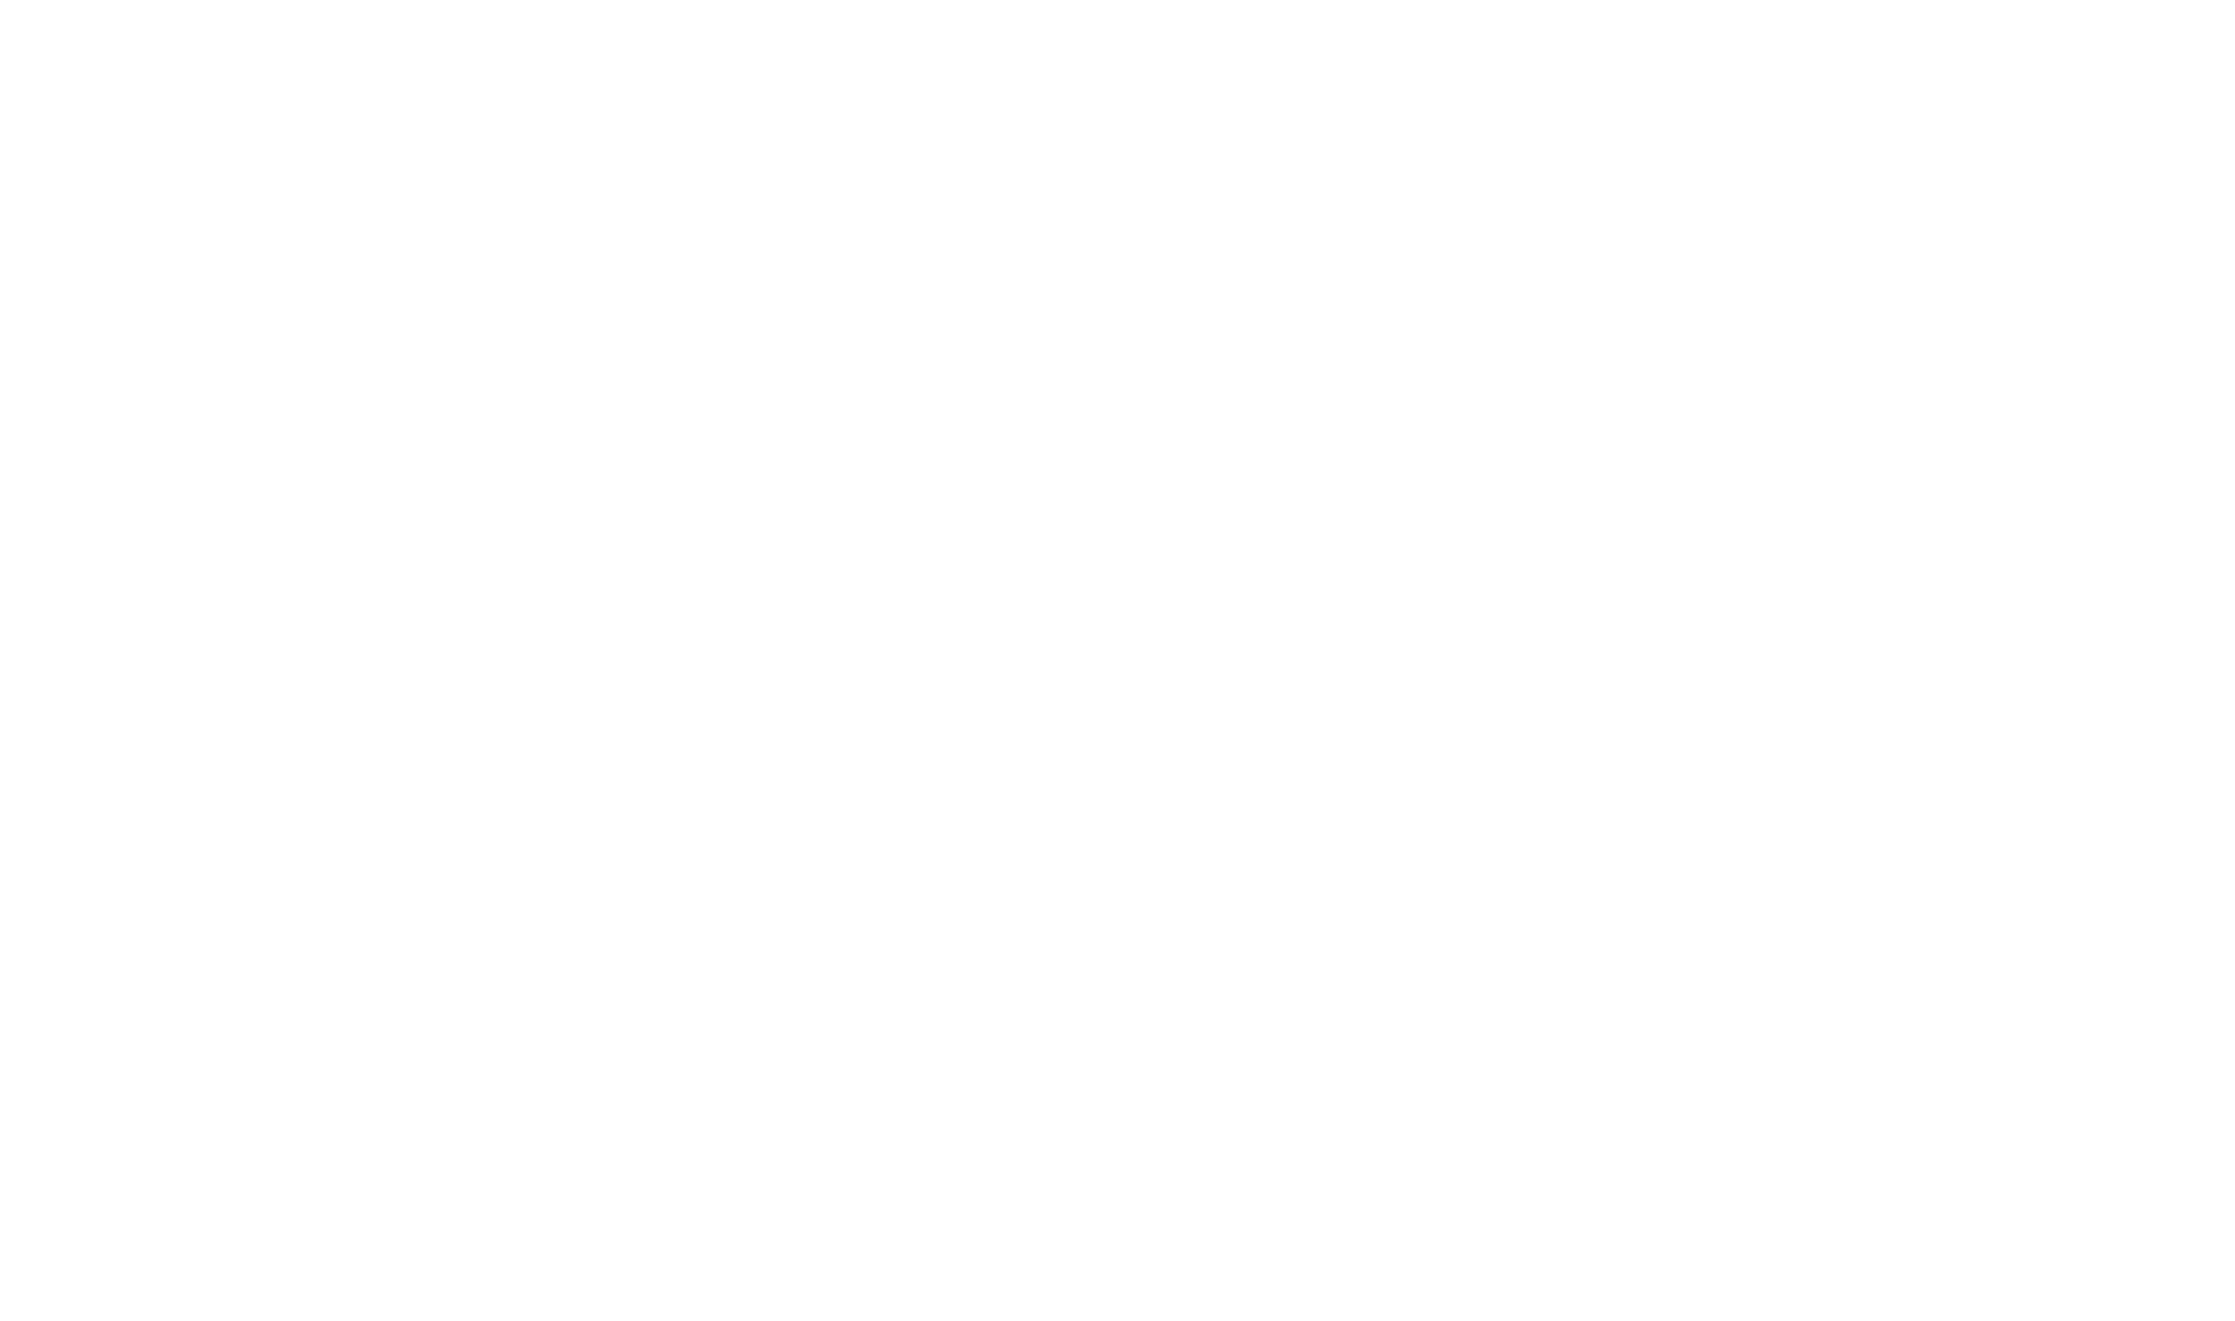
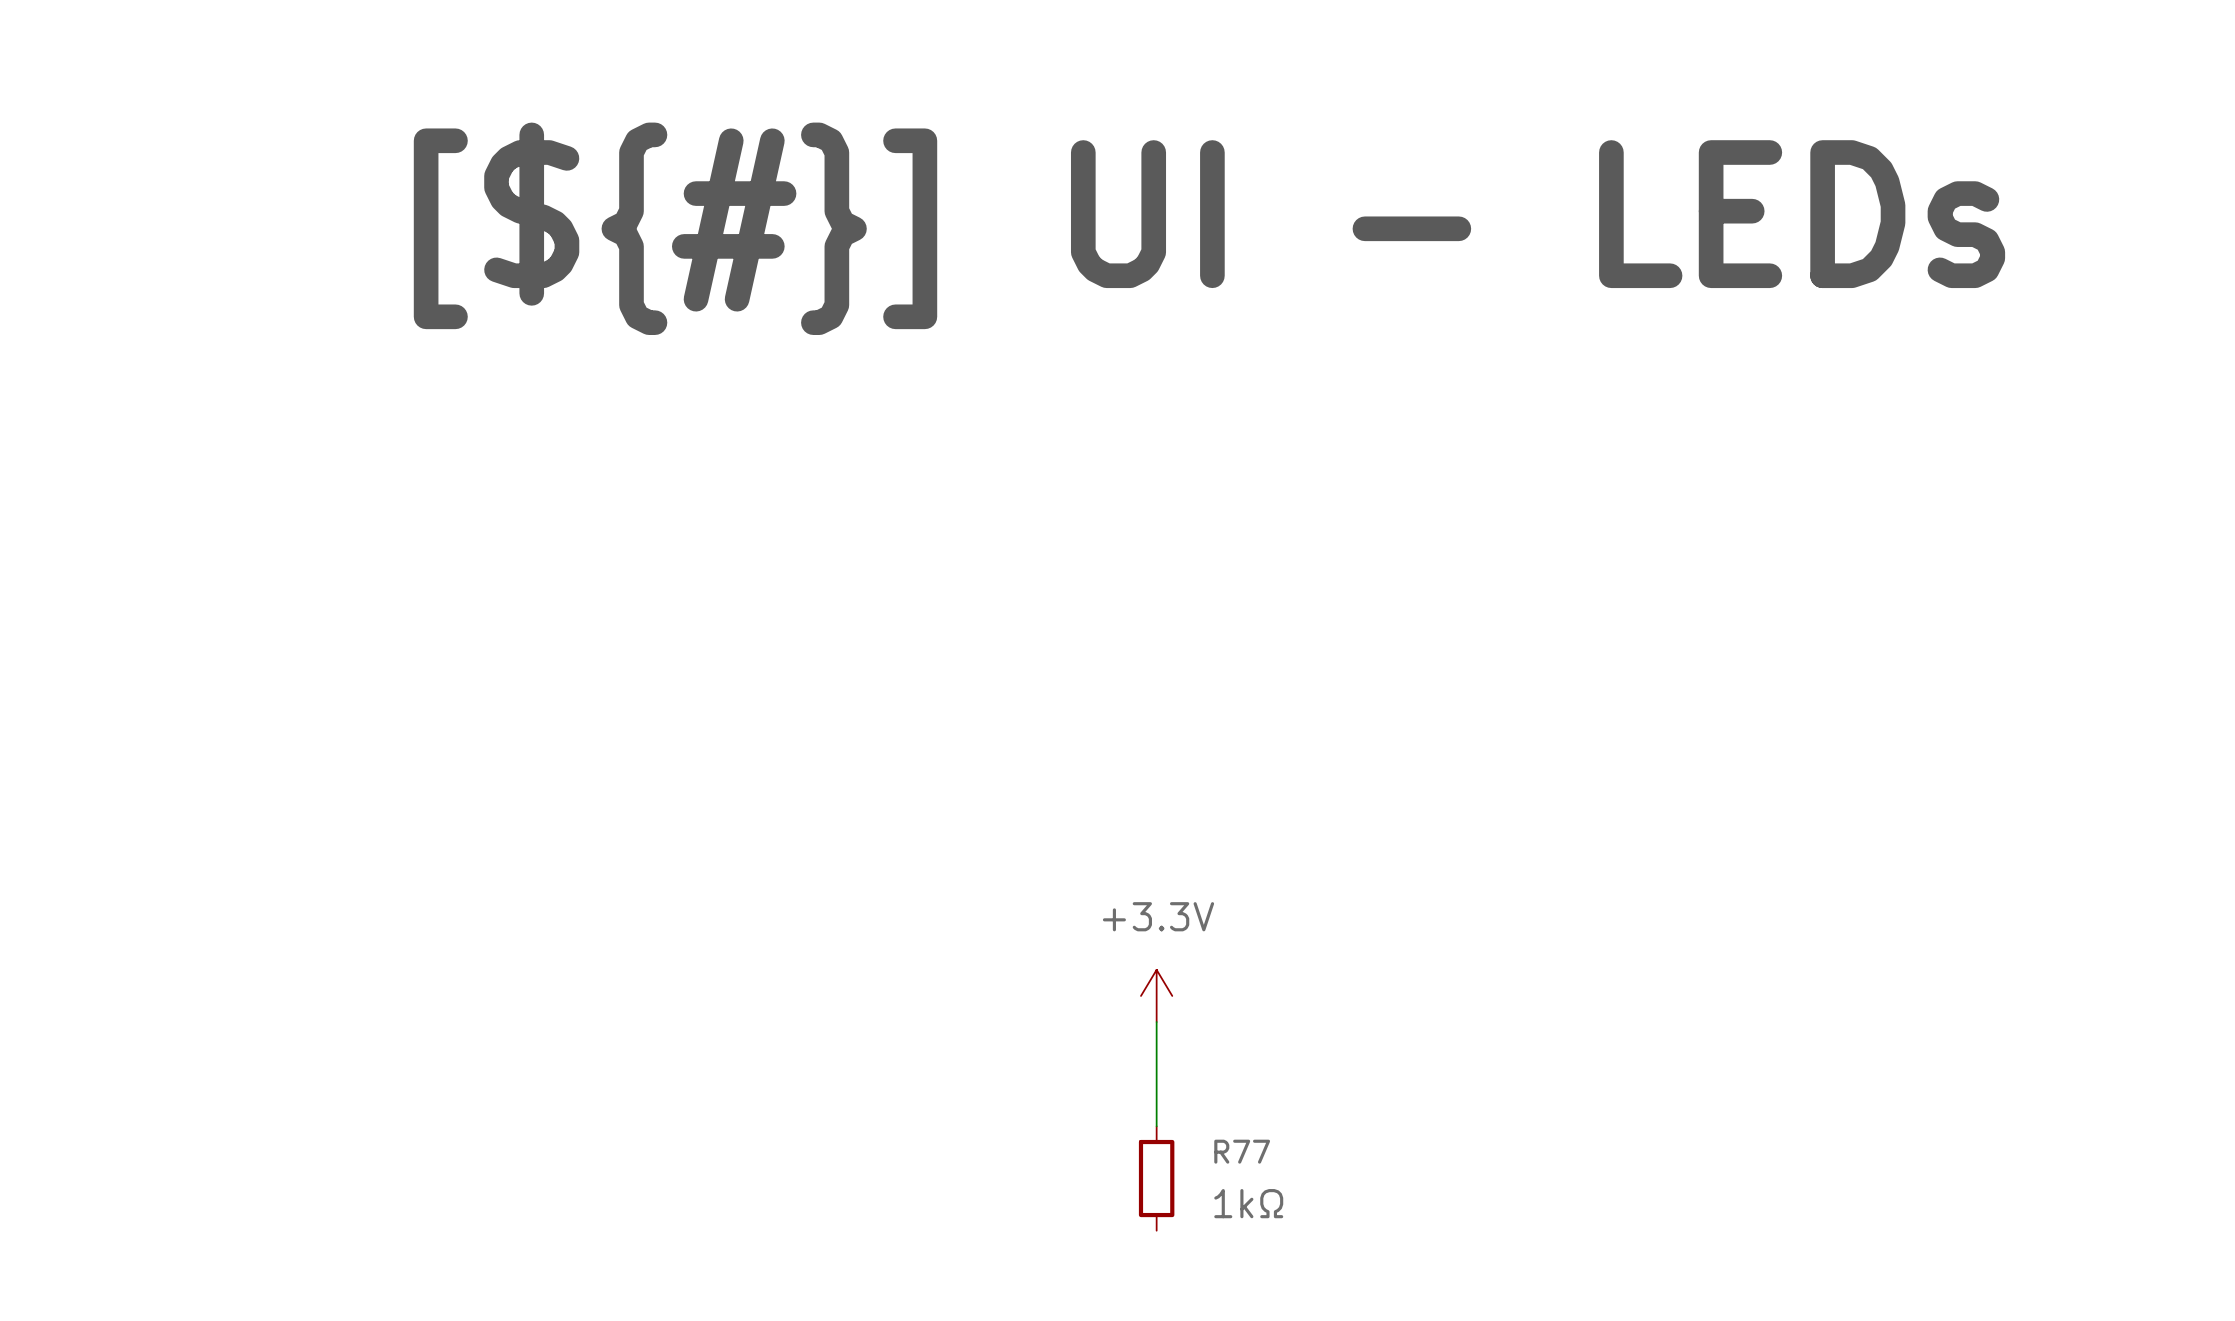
text: none -> [${#}] UI - LEDs (1209, 228)
power symbol: none -> +3.3V (1156, 995)
wire: none -> (1156, 1022) (1156, 1126)
R77: none -> 1kΩ (1156, 1178)

